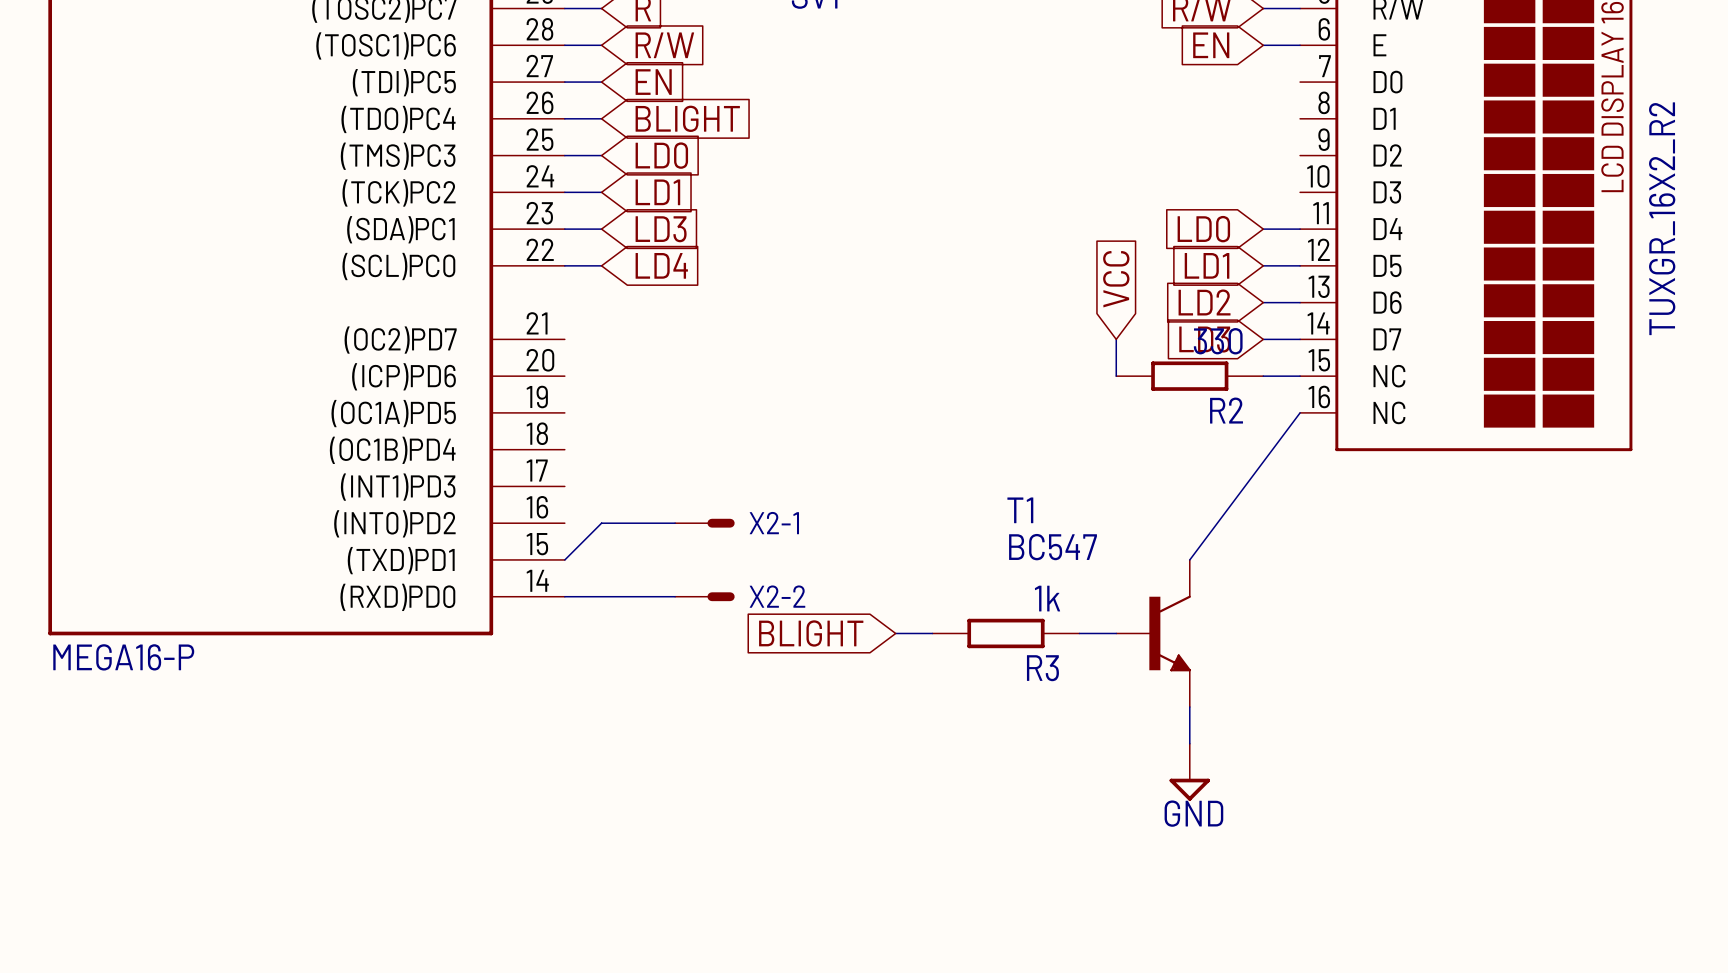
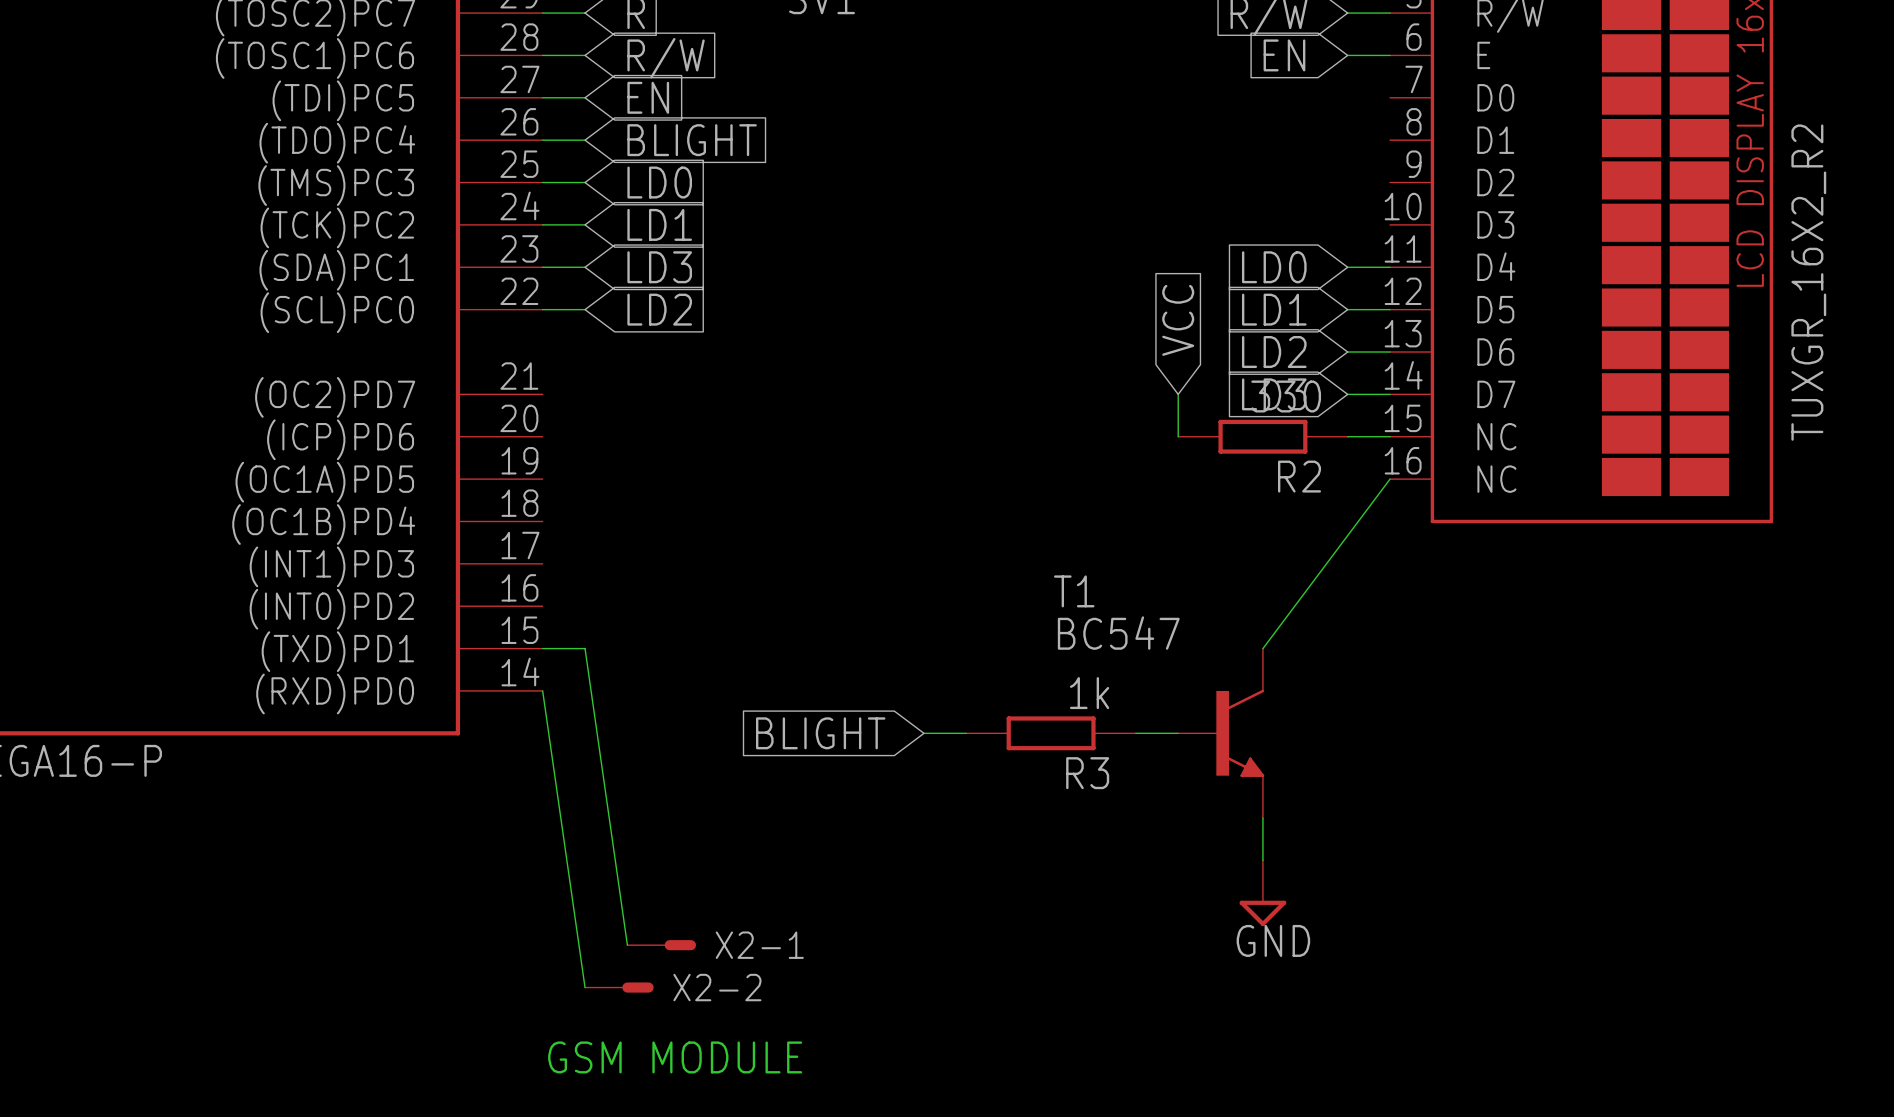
global label: LD4 (661, 265) -> LD2 (659, 309)
wire: (675, 523) (601, 523) (564, 559) -> (627, 945) (585, 648) (542, 648)
X2-1 position: (704, 523) -> (661, 945)
wire: (564, 596) (675, 596) -> (542, 690) (585, 987)
X2-2 position: (704, 596) -> (619, 987)
text: none -> GSM MODULE (675, 1057)

